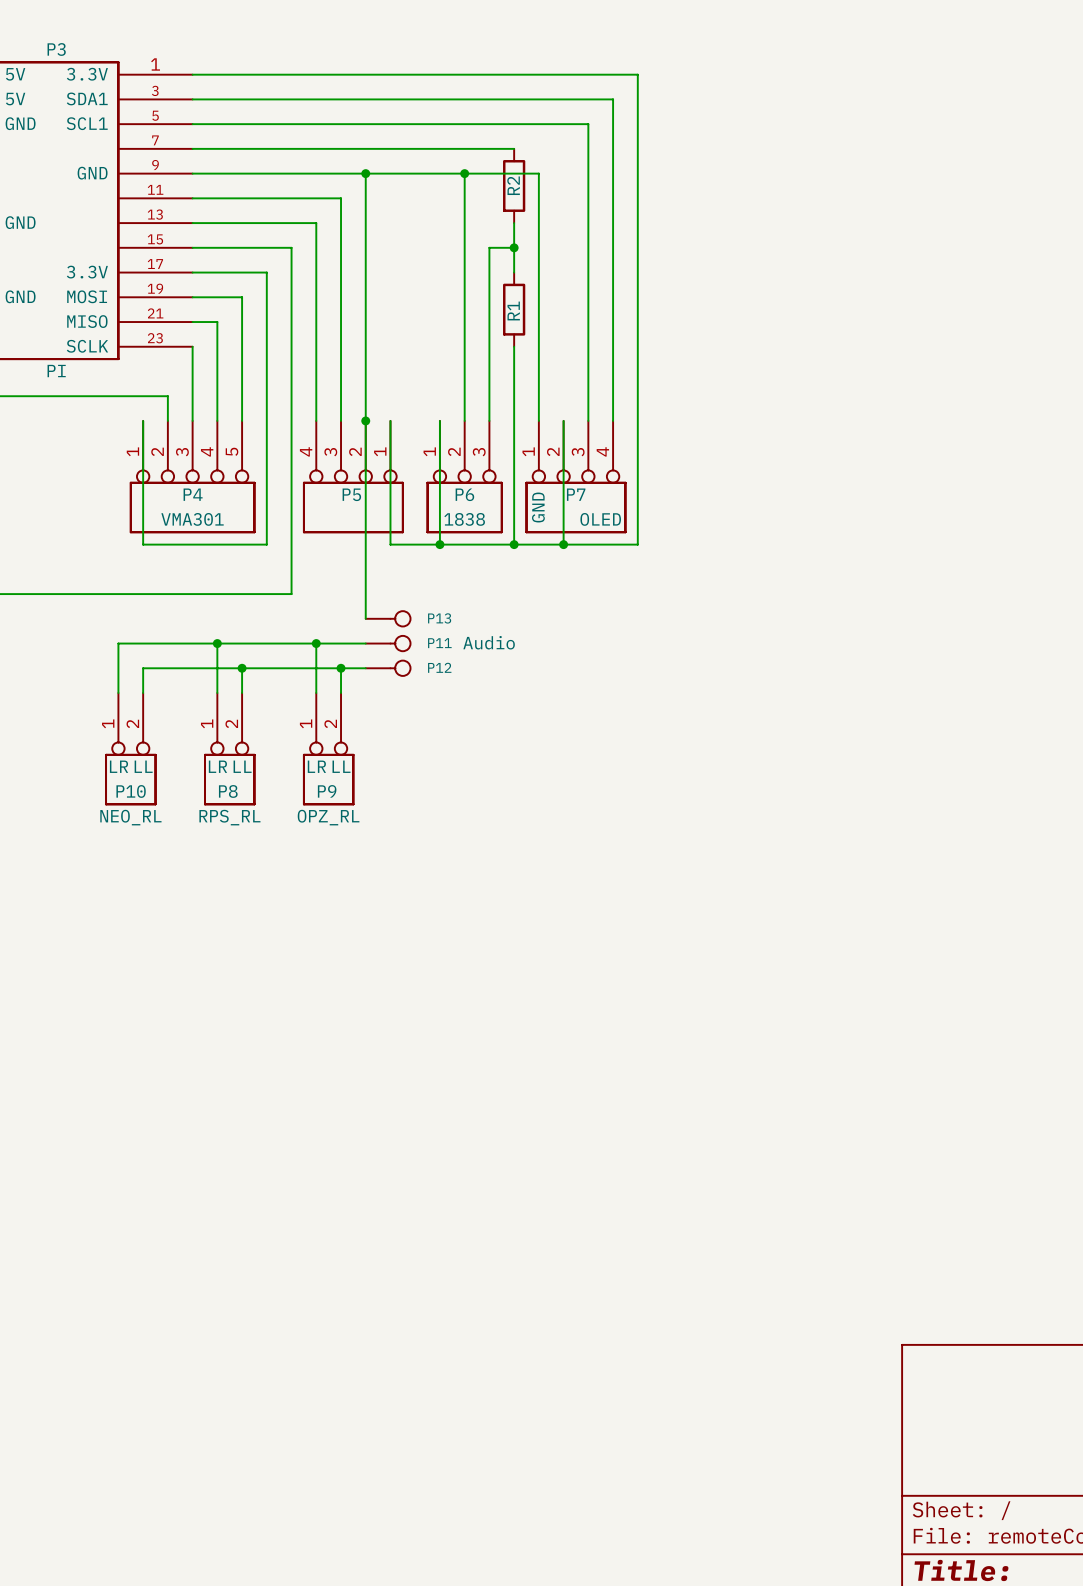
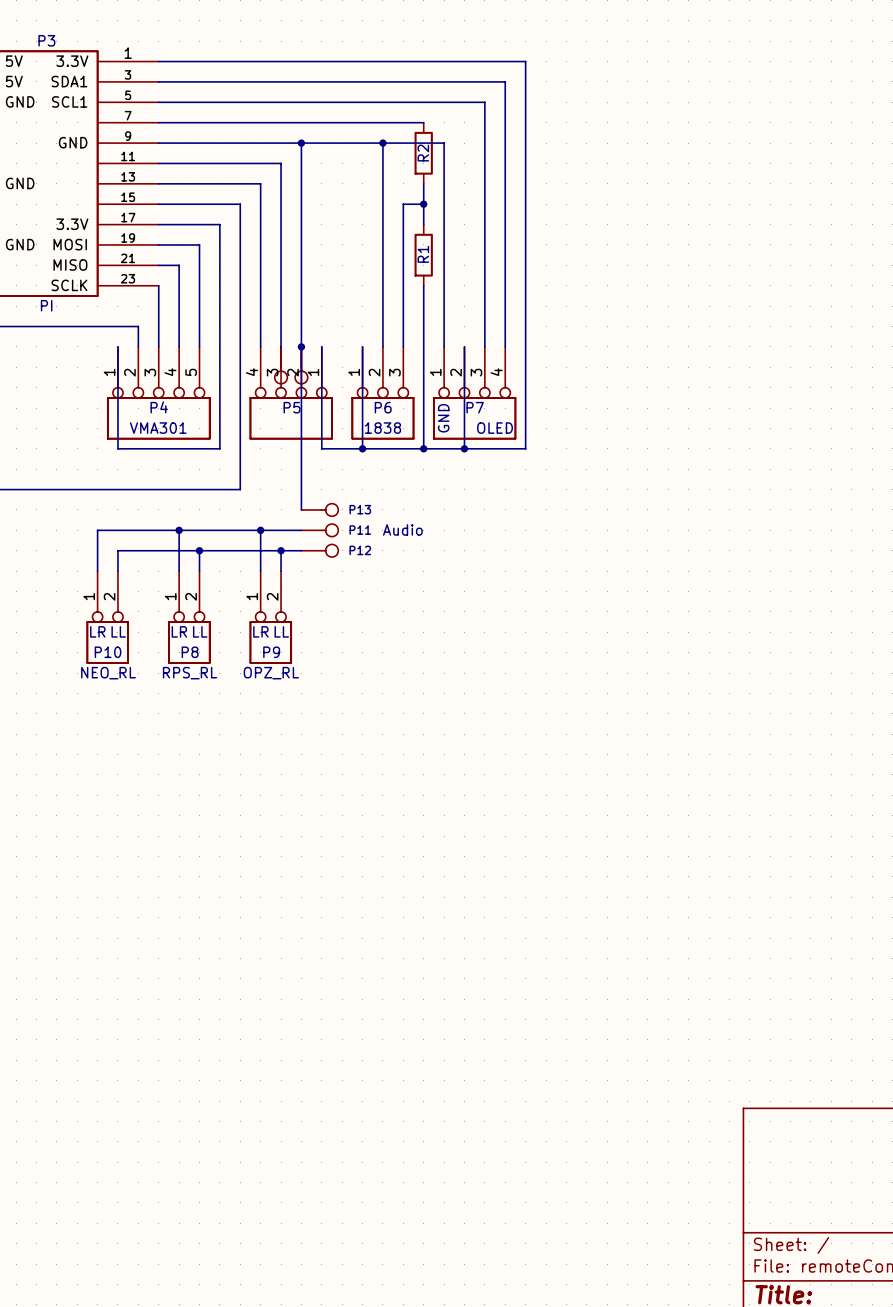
part: none -> (281, 365)
part: none -> (301, 365)

